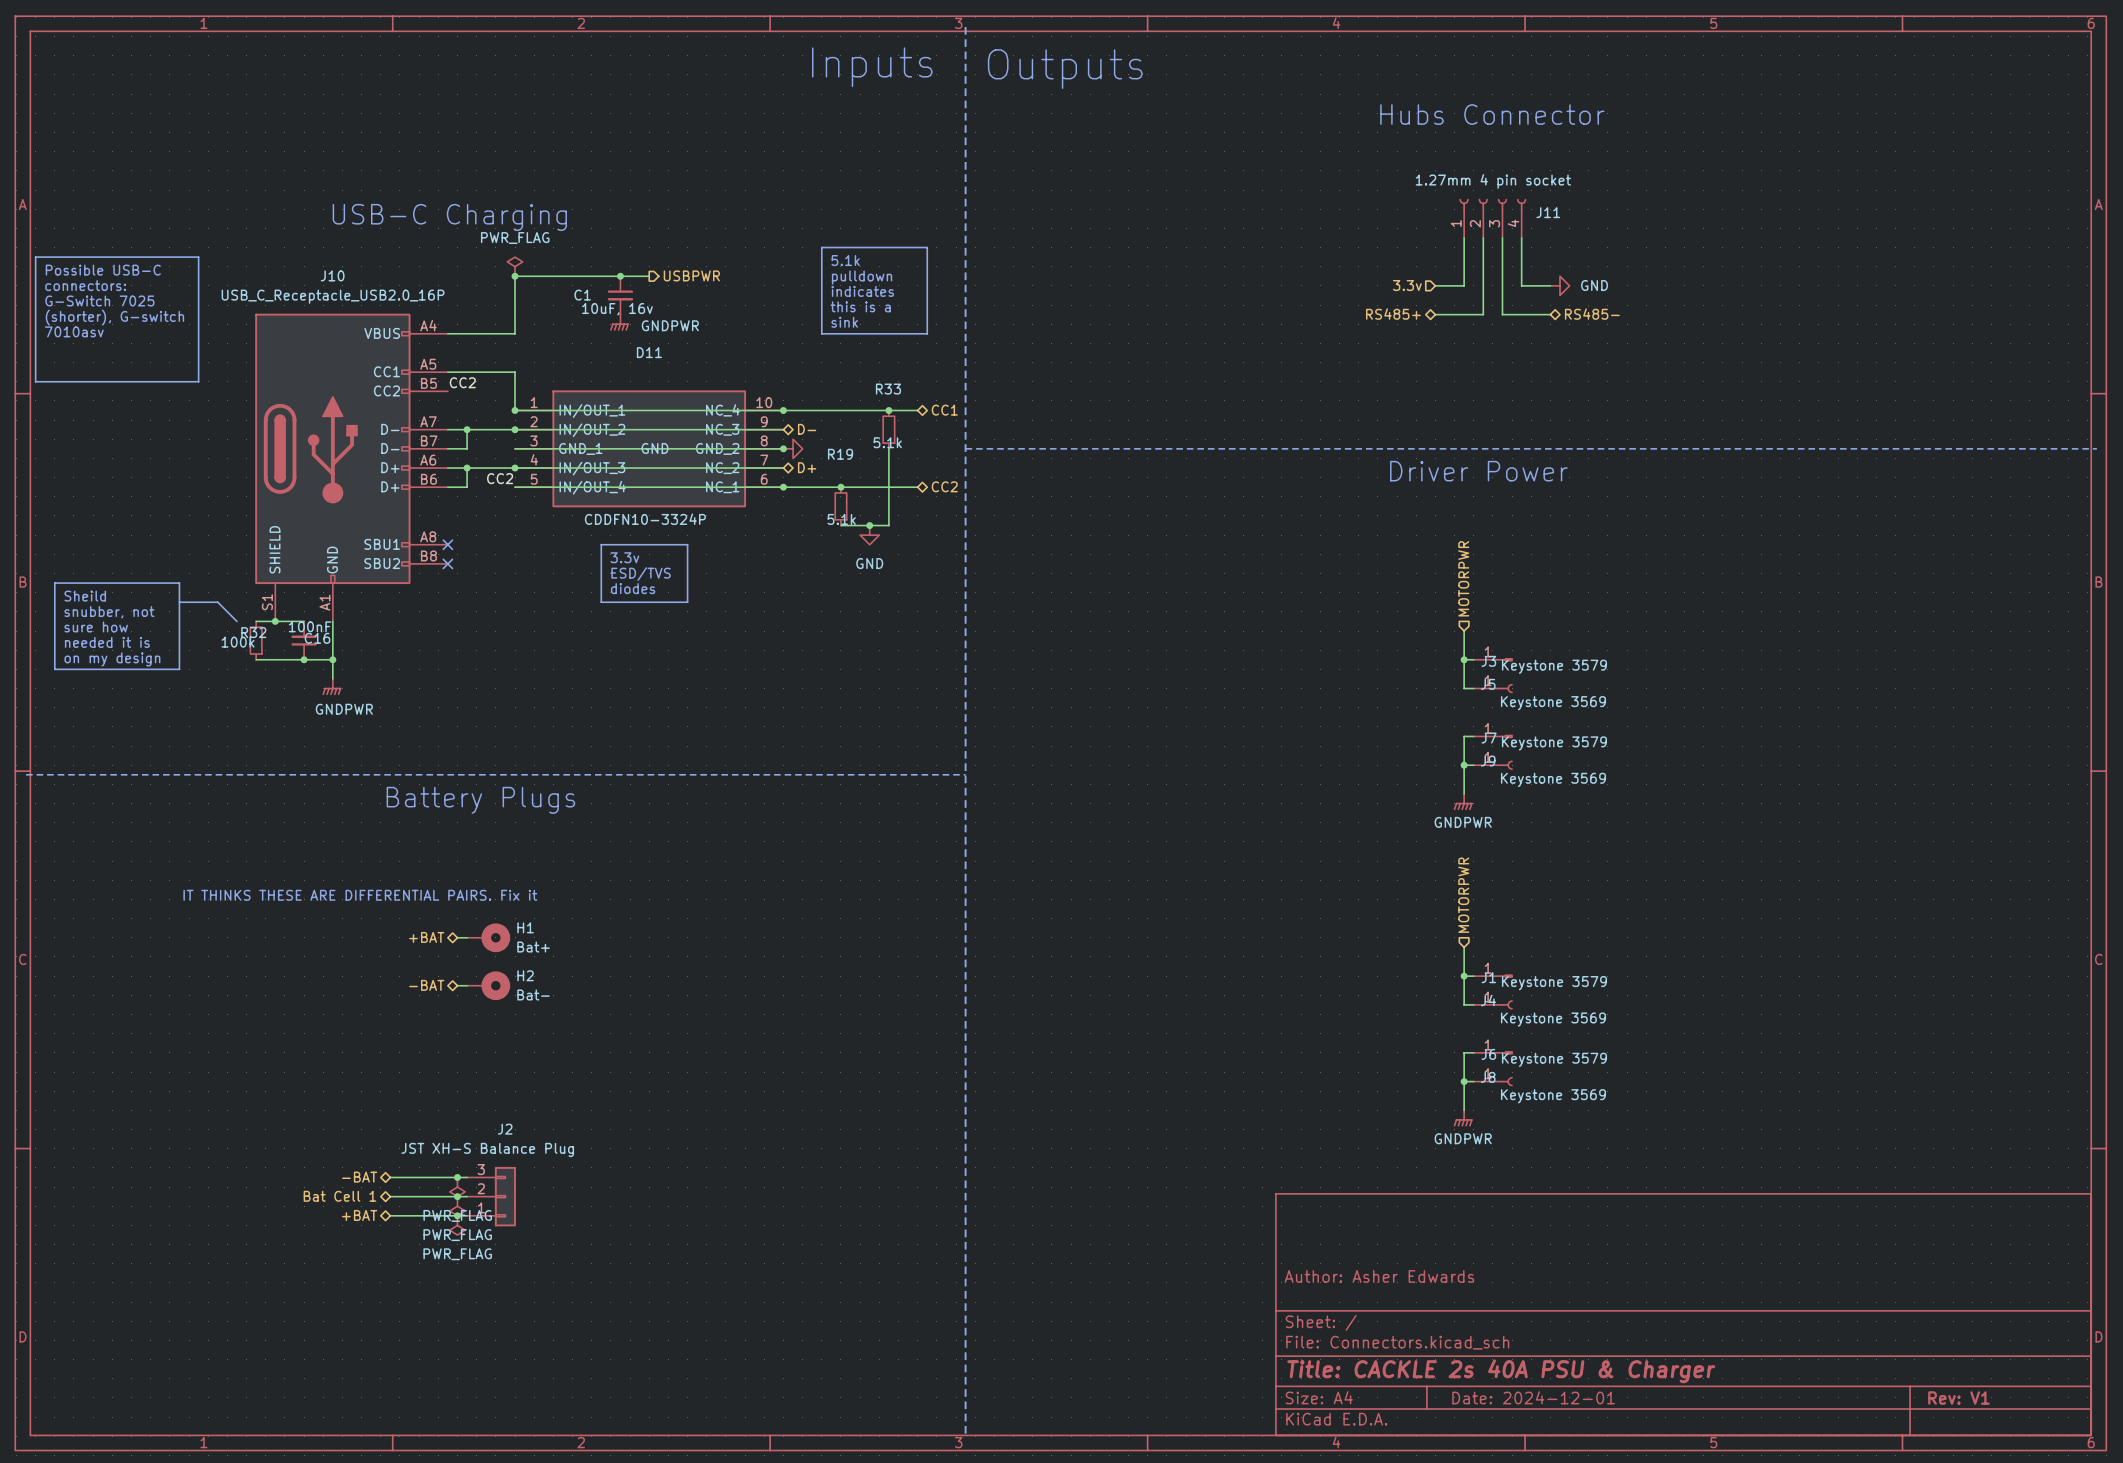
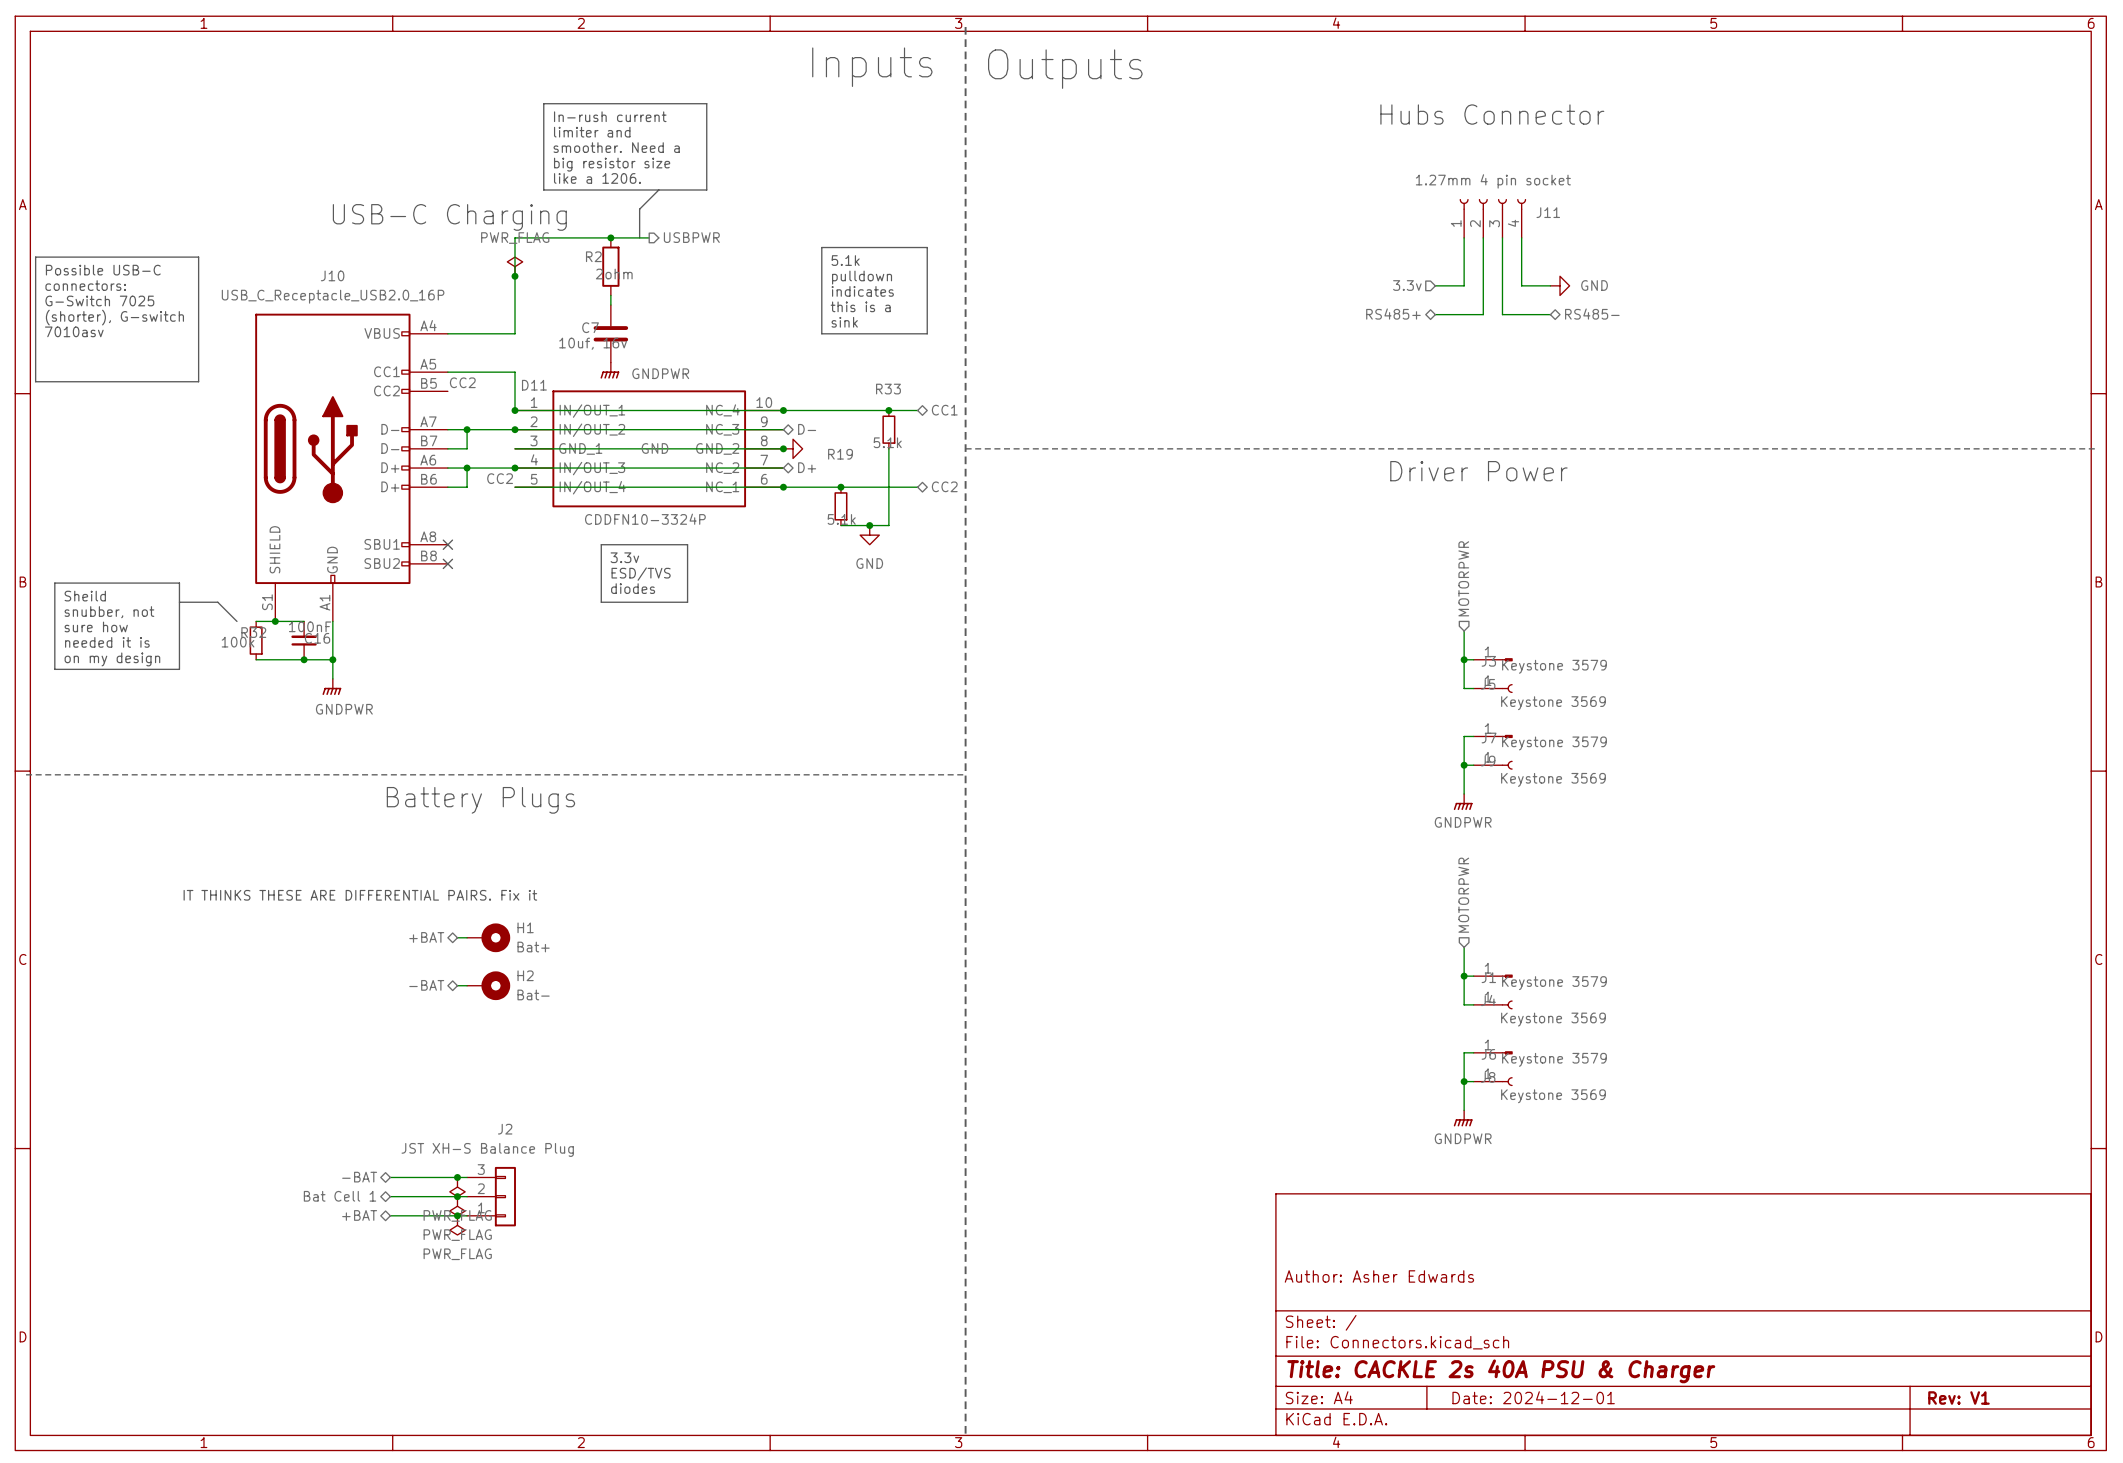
line: none -> (543, 103) (706, 103) (706, 190) (543, 190) (543, 103)
text: none -> In-rush current (610, 116)
text: none -> limiter and (592, 132)
text: none -> smoother. Need a (616, 147)
text: none -> big resistor size (612, 164)
text: none -> like a 1206. (597, 178)
line: none -> (658, 190) (639, 209) (639, 237)
R2: none -> 2ohm (610, 266)
hierarchical label position: USBPWR (691, 275) -> USBPWR (691, 237)
wire: (515, 276) (649, 276) -> (515, 276) (515, 237) (649, 237)
junction position: (620, 276) -> (610, 237)
wire: none -> (610, 295) (610, 305)
C1: 10uF, 16v (620, 295) -> none
power symbol position: GNDPWR (619, 322) -> GNDPWR (609, 370)
C7: none -> 10uf, 16v (610, 333)
D11 name position: D11 (649, 352) -> D11 (534, 385)

